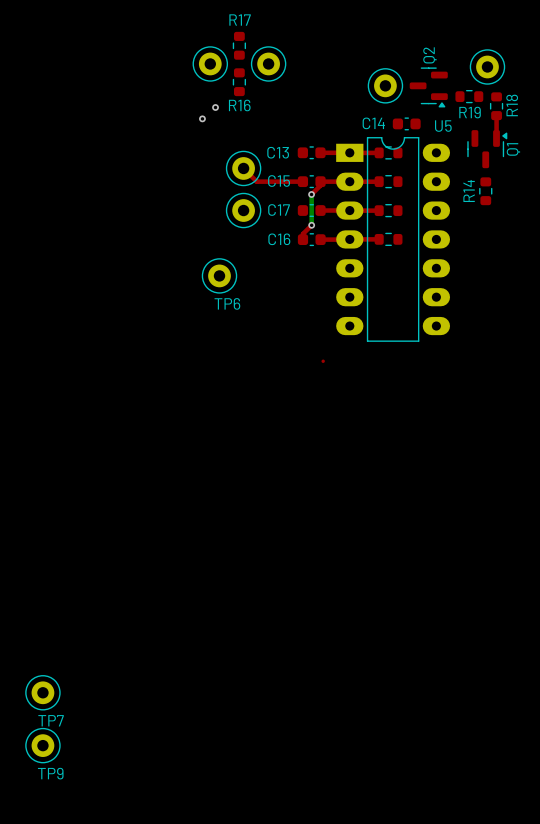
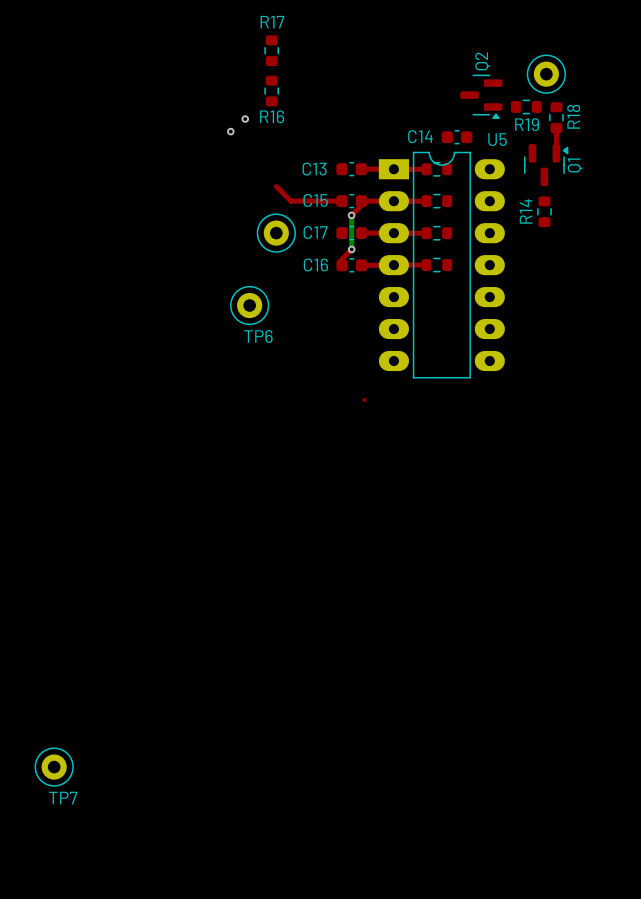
part: (210, 63) -> none
part: (268, 63) -> none
part: (385, 85) -> none
part: (243, 168) -> none
TP9: (42, 745) -> none

